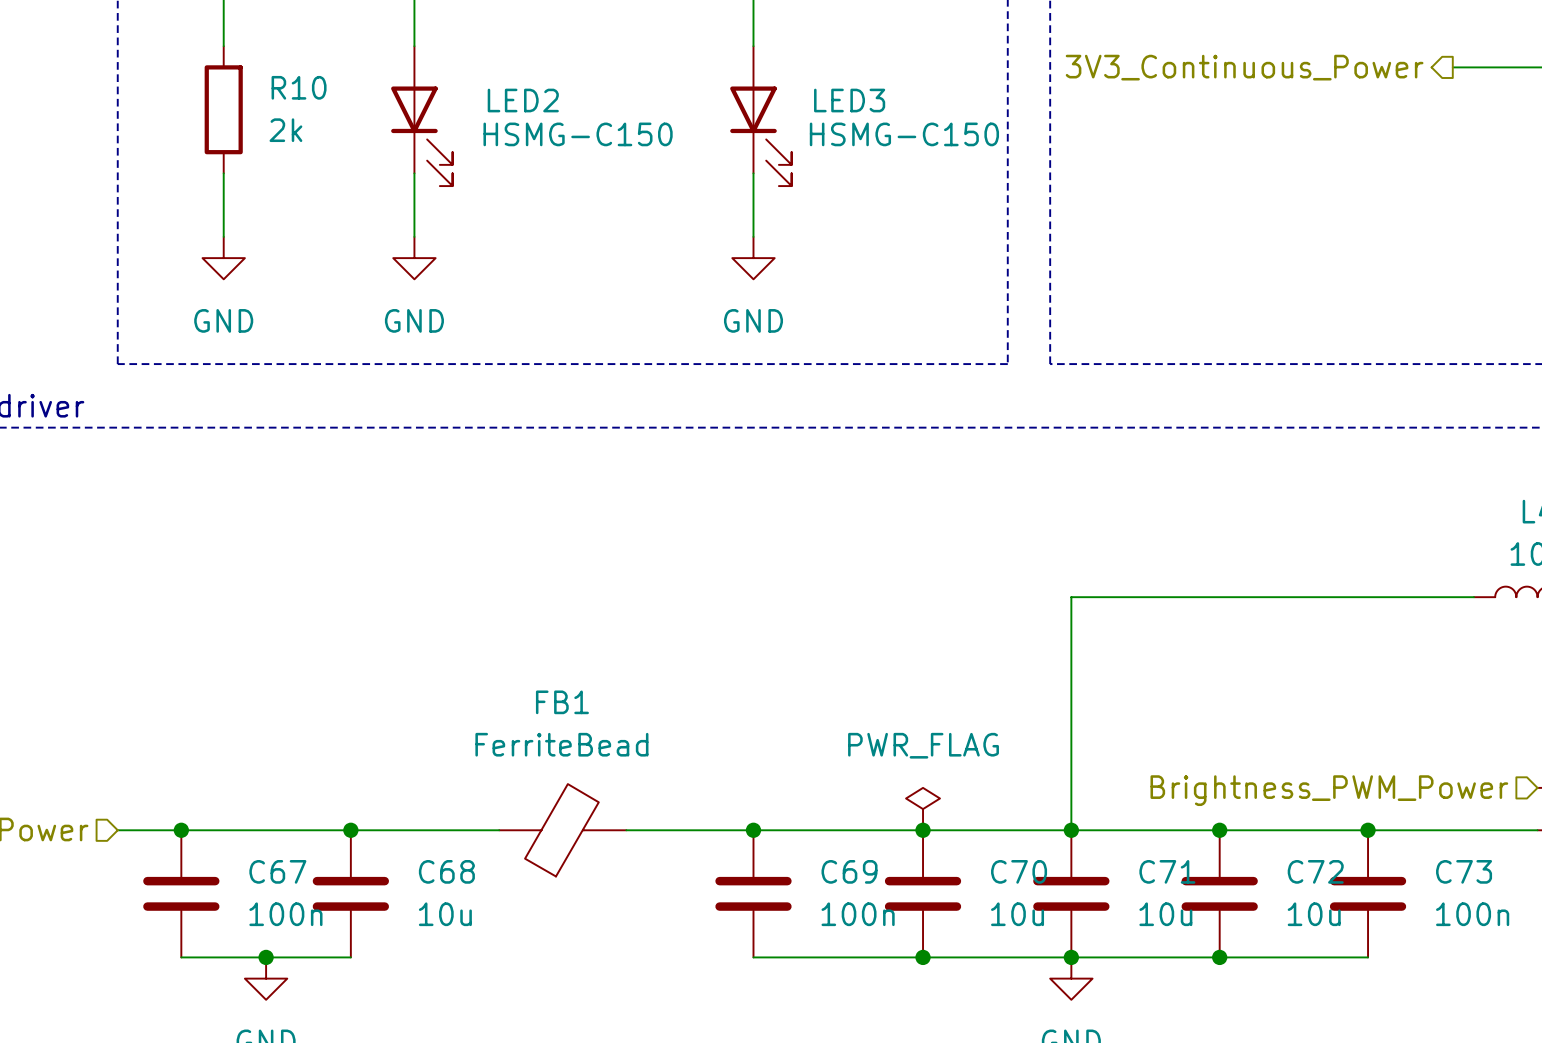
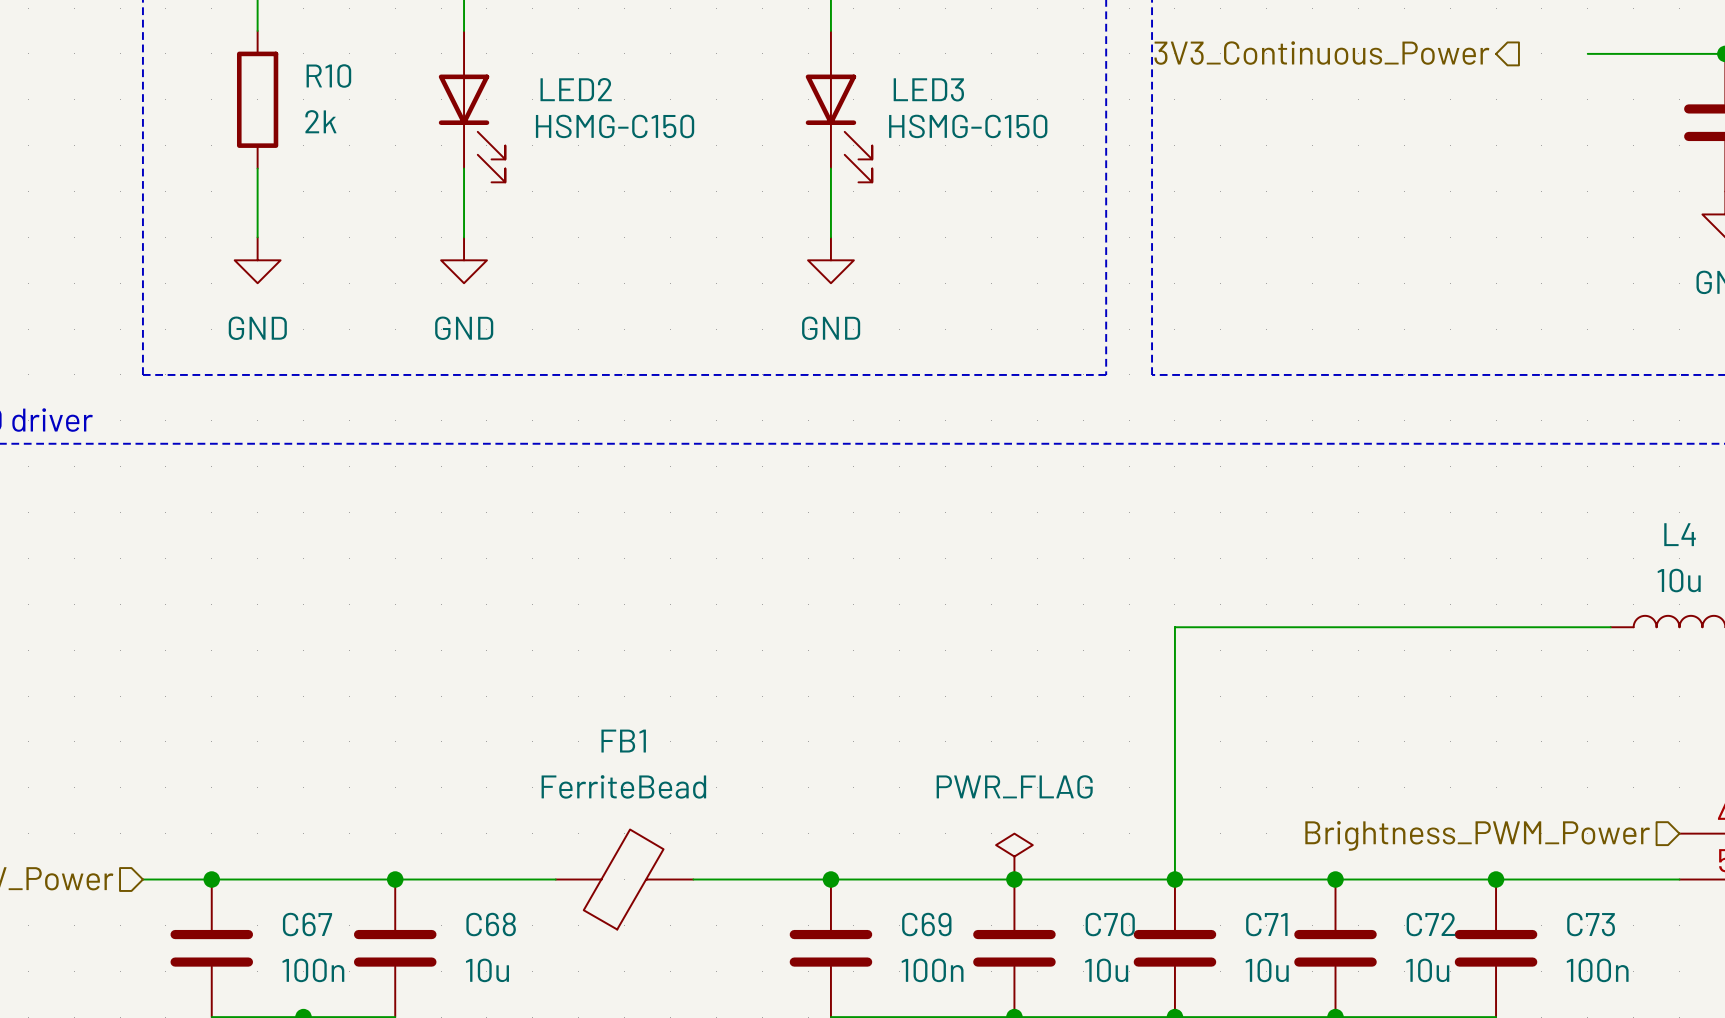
hierarchical label position: 3V3_Continuous_Power (1244, 67) -> 3V3_Continuous_Power (1321, 53)

